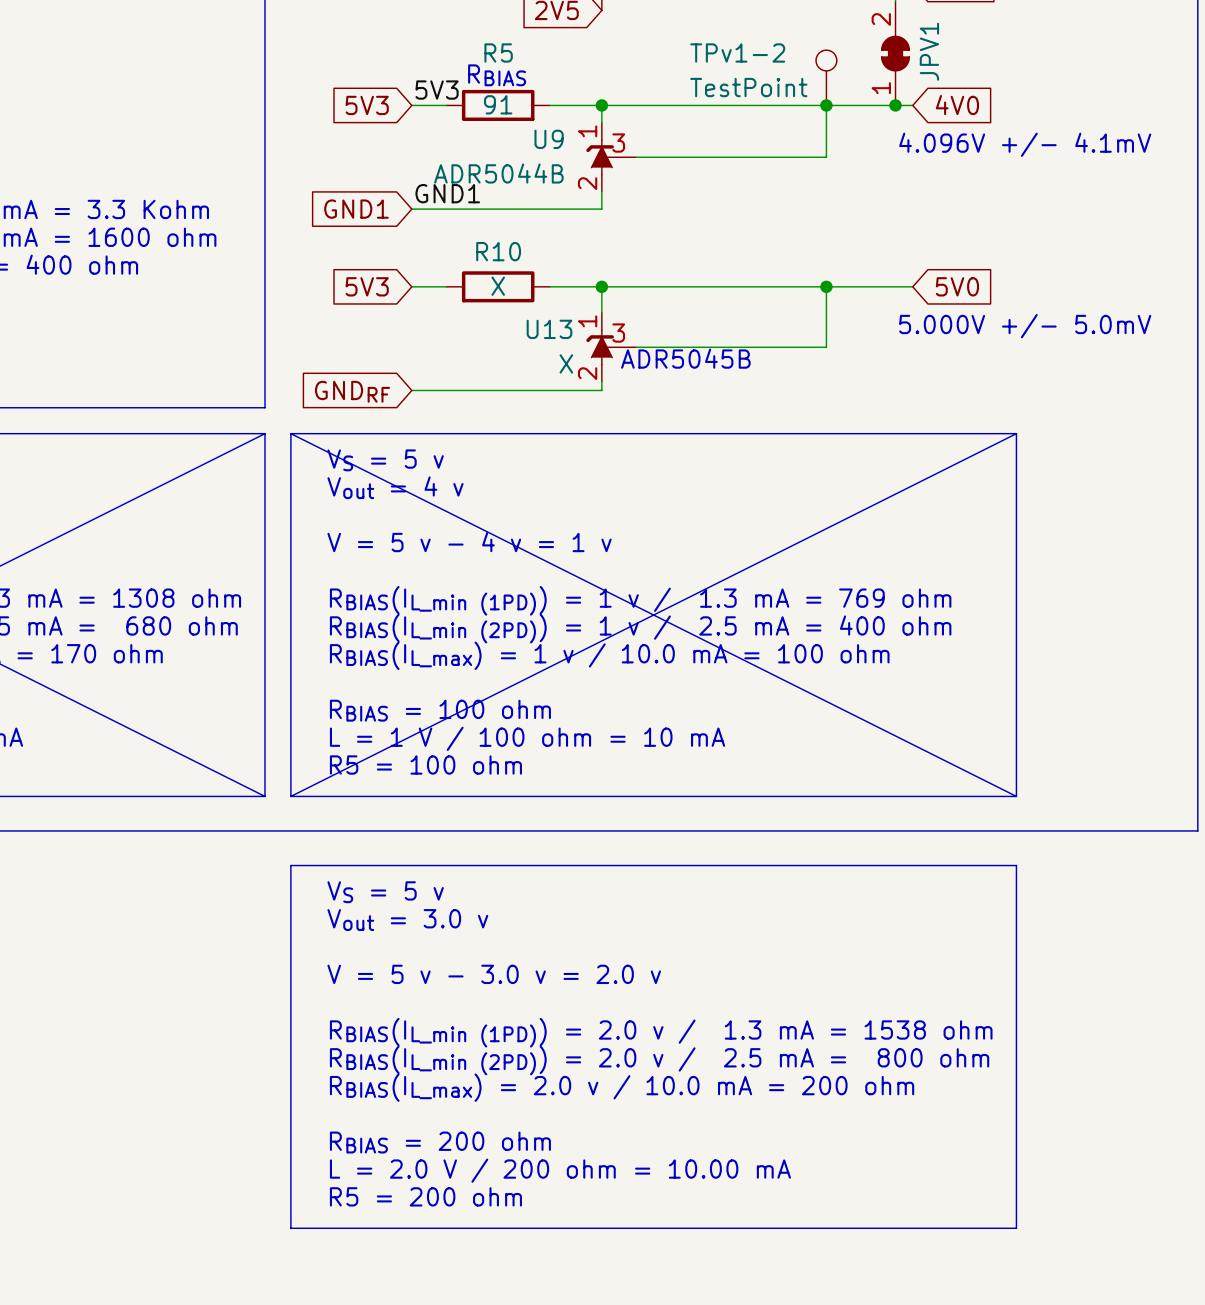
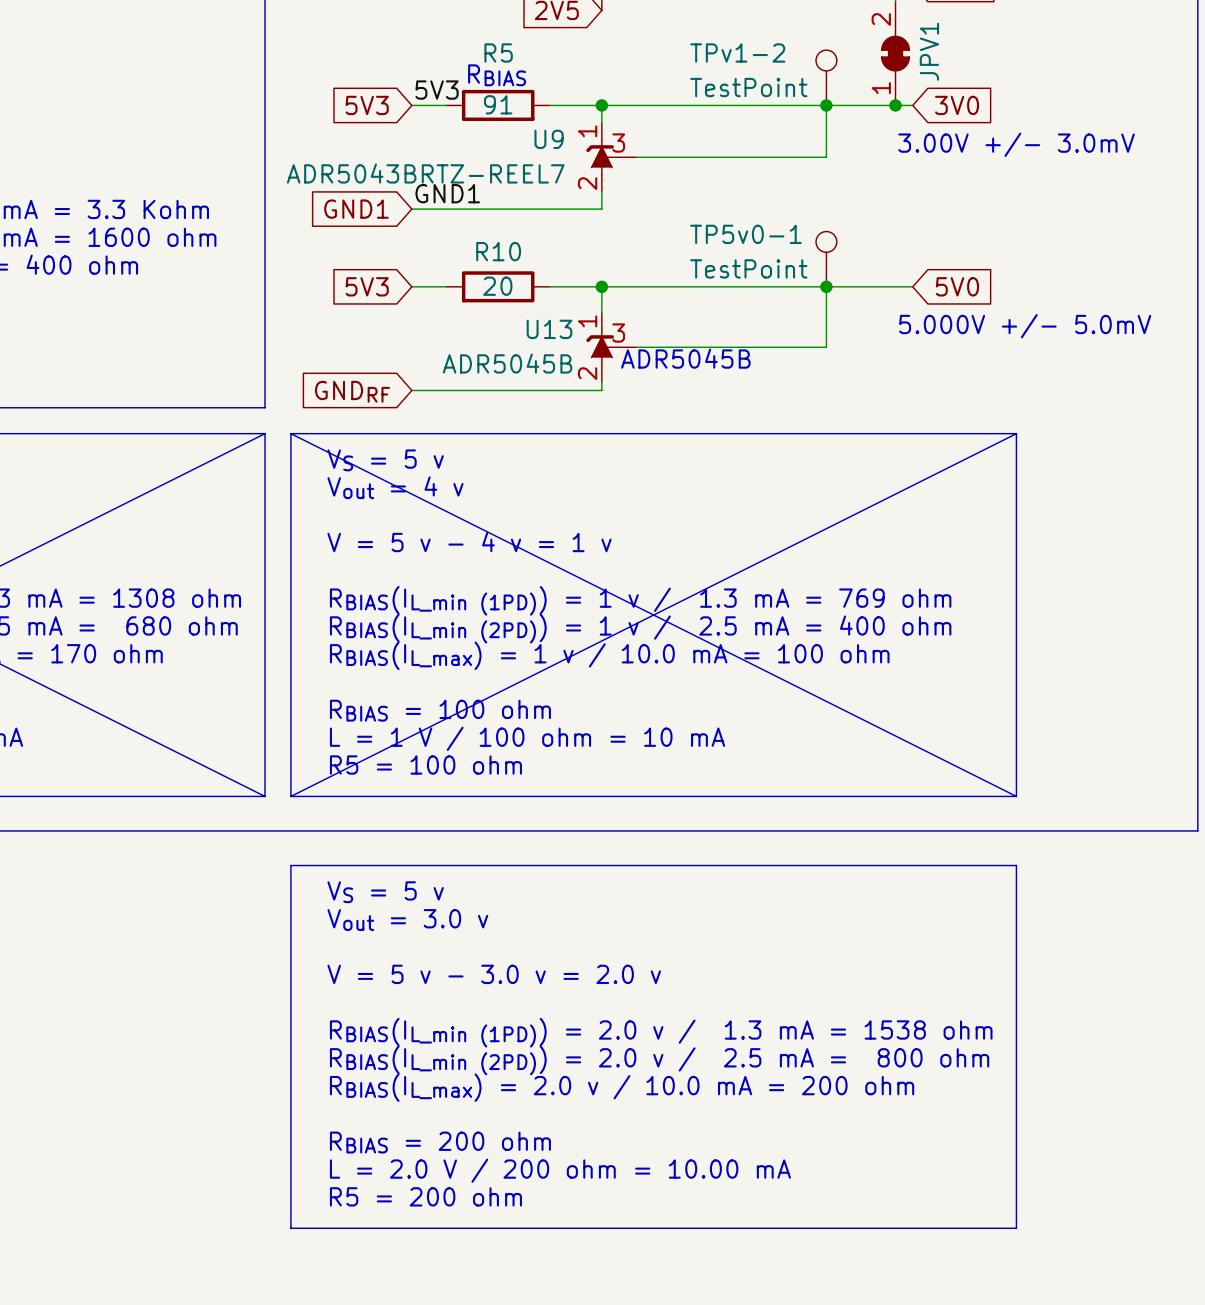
global label: 4V0 (957, 105) -> 3V0 (957, 105)
text: 4.096V +/- 4.1mV (1025, 144) -> 3.00V +/- 3.0mV (1016, 144)
U9 value: ADR5044B (498, 173) -> ADR5043BRTZ-REEL7 (425, 173)
TP5v0-1: none -> TestPoint (826, 259)
R10 value: X (498, 286) -> 20 (497, 286)
U13 value: X (566, 363) -> ADR5045B (507, 363)

